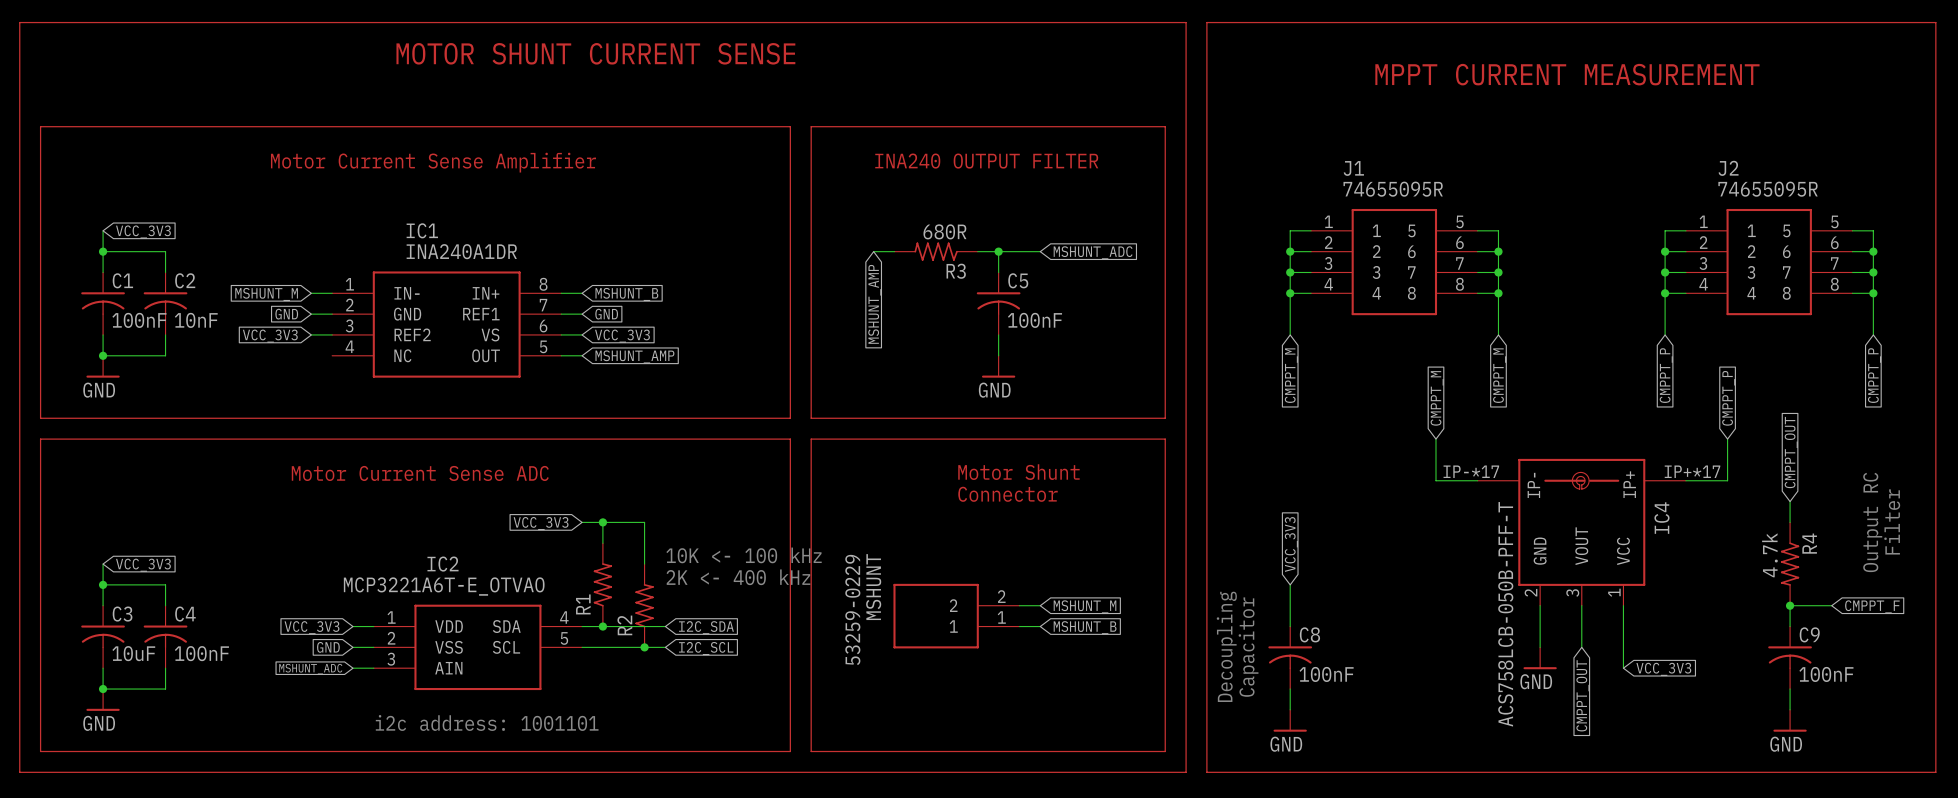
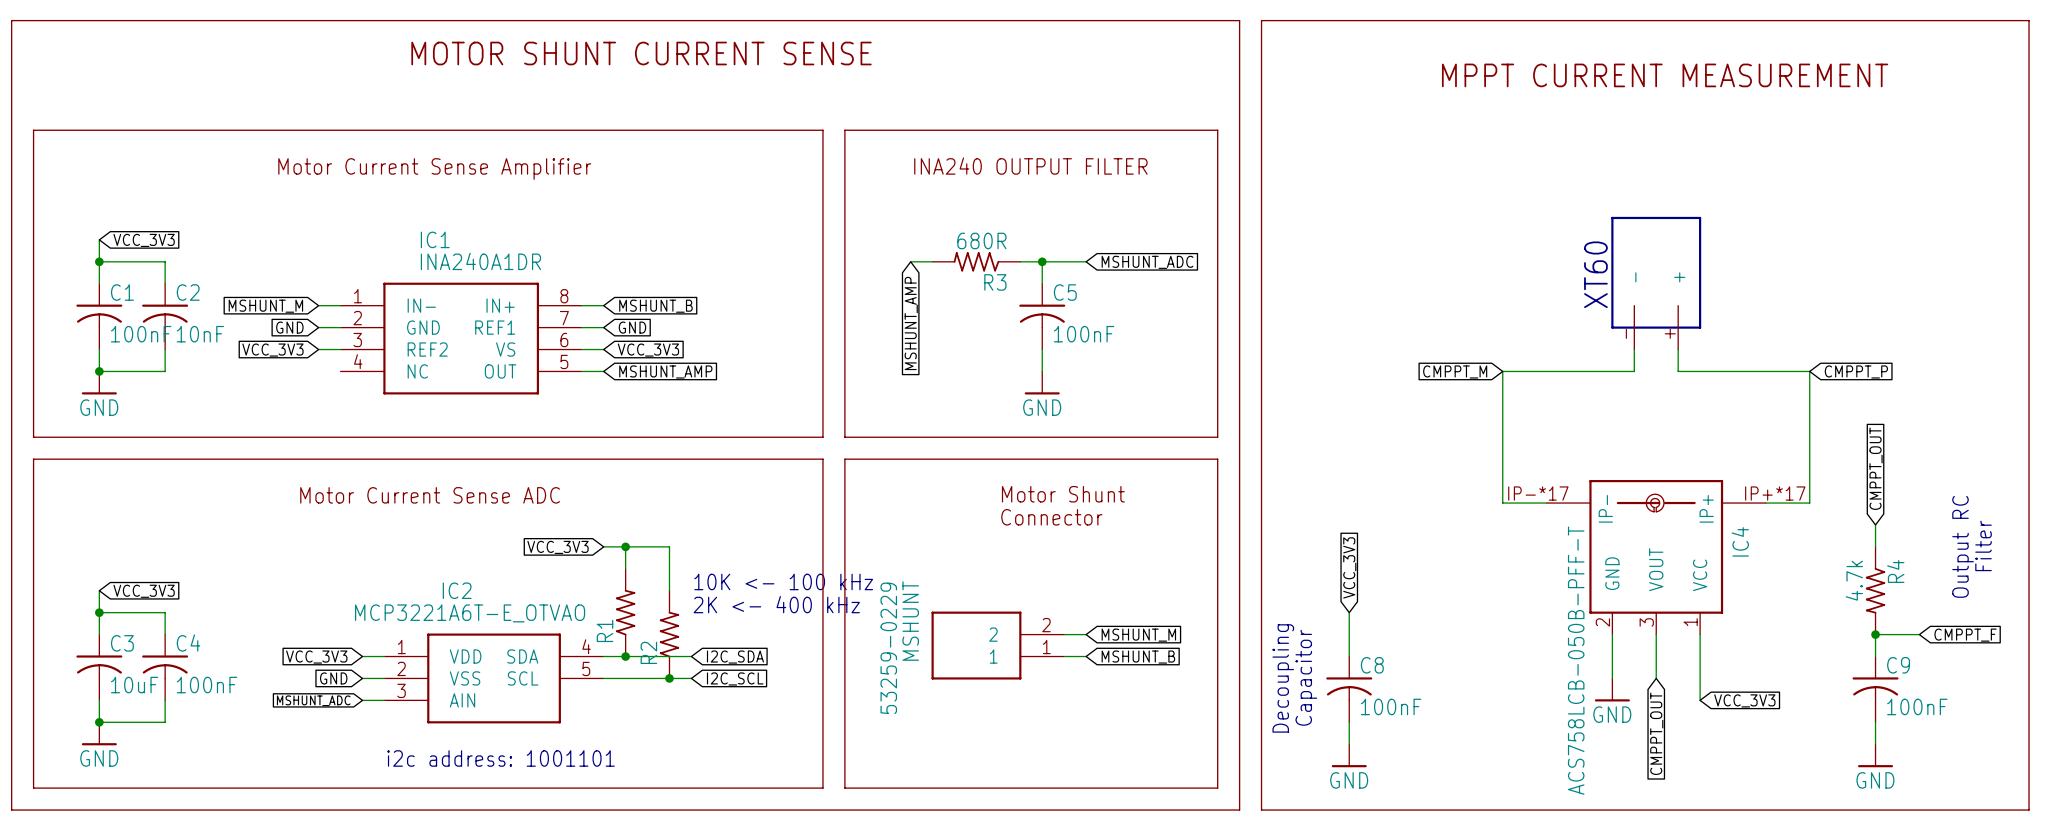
wire: (1311, 230) (1290, 230) (1290, 334) -> none
wire: (1477, 230) (1498, 230) (1498, 334) -> none
wire: (1685, 230) (1665, 230) (1665, 334) -> none
wire: (1852, 230) (1873, 230) (1873, 334) -> none
wire: (1290, 251) (1311, 251) -> none
junction: (1290, 251) -> none
wire: (1477, 251) (1498, 251) -> none
junction: (1498, 251) -> none
wire: (1665, 251) (1685, 251) -> none
junction: (1665, 251) -> none
wire: (1852, 251) (1873, 251) -> none
junction: (1873, 251) -> none
J1: 74655095R (1394, 262) -> none
J2: 74655095R (1769, 262) -> none
part: none -> (1656, 283)
wire: (1290, 272) (1311, 272) -> none
junction: (1290, 272) -> none
wire: (1477, 272) (1498, 272) -> none
junction: (1498, 272) -> none
wire: (1665, 272) (1685, 272) -> none
junction: (1665, 272) -> none
wire: (1852, 272) (1873, 272) -> none
junction: (1873, 272) -> none
wire: (1290, 293) (1311, 293) -> none
junction: (1290, 293) -> none
wire: (1477, 293) (1498, 293) -> none
junction: (1498, 293) -> none
wire: (1665, 293) (1685, 293) -> none
junction: (1665, 293) -> none
wire: (1852, 293) (1873, 293) -> none
junction: (1873, 293) -> none
wire: none -> (1634, 349) (1634, 371) (1502, 371) (1502, 459)
wire: none -> (1678, 349) (1678, 371) (1809, 371) (1809, 459)
global label: CMPPT_M (1291, 375) -> none
global label: CMPPT_M (1499, 375) -> none
global label: CMPPT_P (1666, 375) -> none
global label: CMPPT_P (1874, 375) -> none
global label rotation: 0° (1437, 398) -> 90° counterclockwise (1455, 371)
global label rotation: 0° (1728, 398) -> 90° clockwise (1856, 371)

